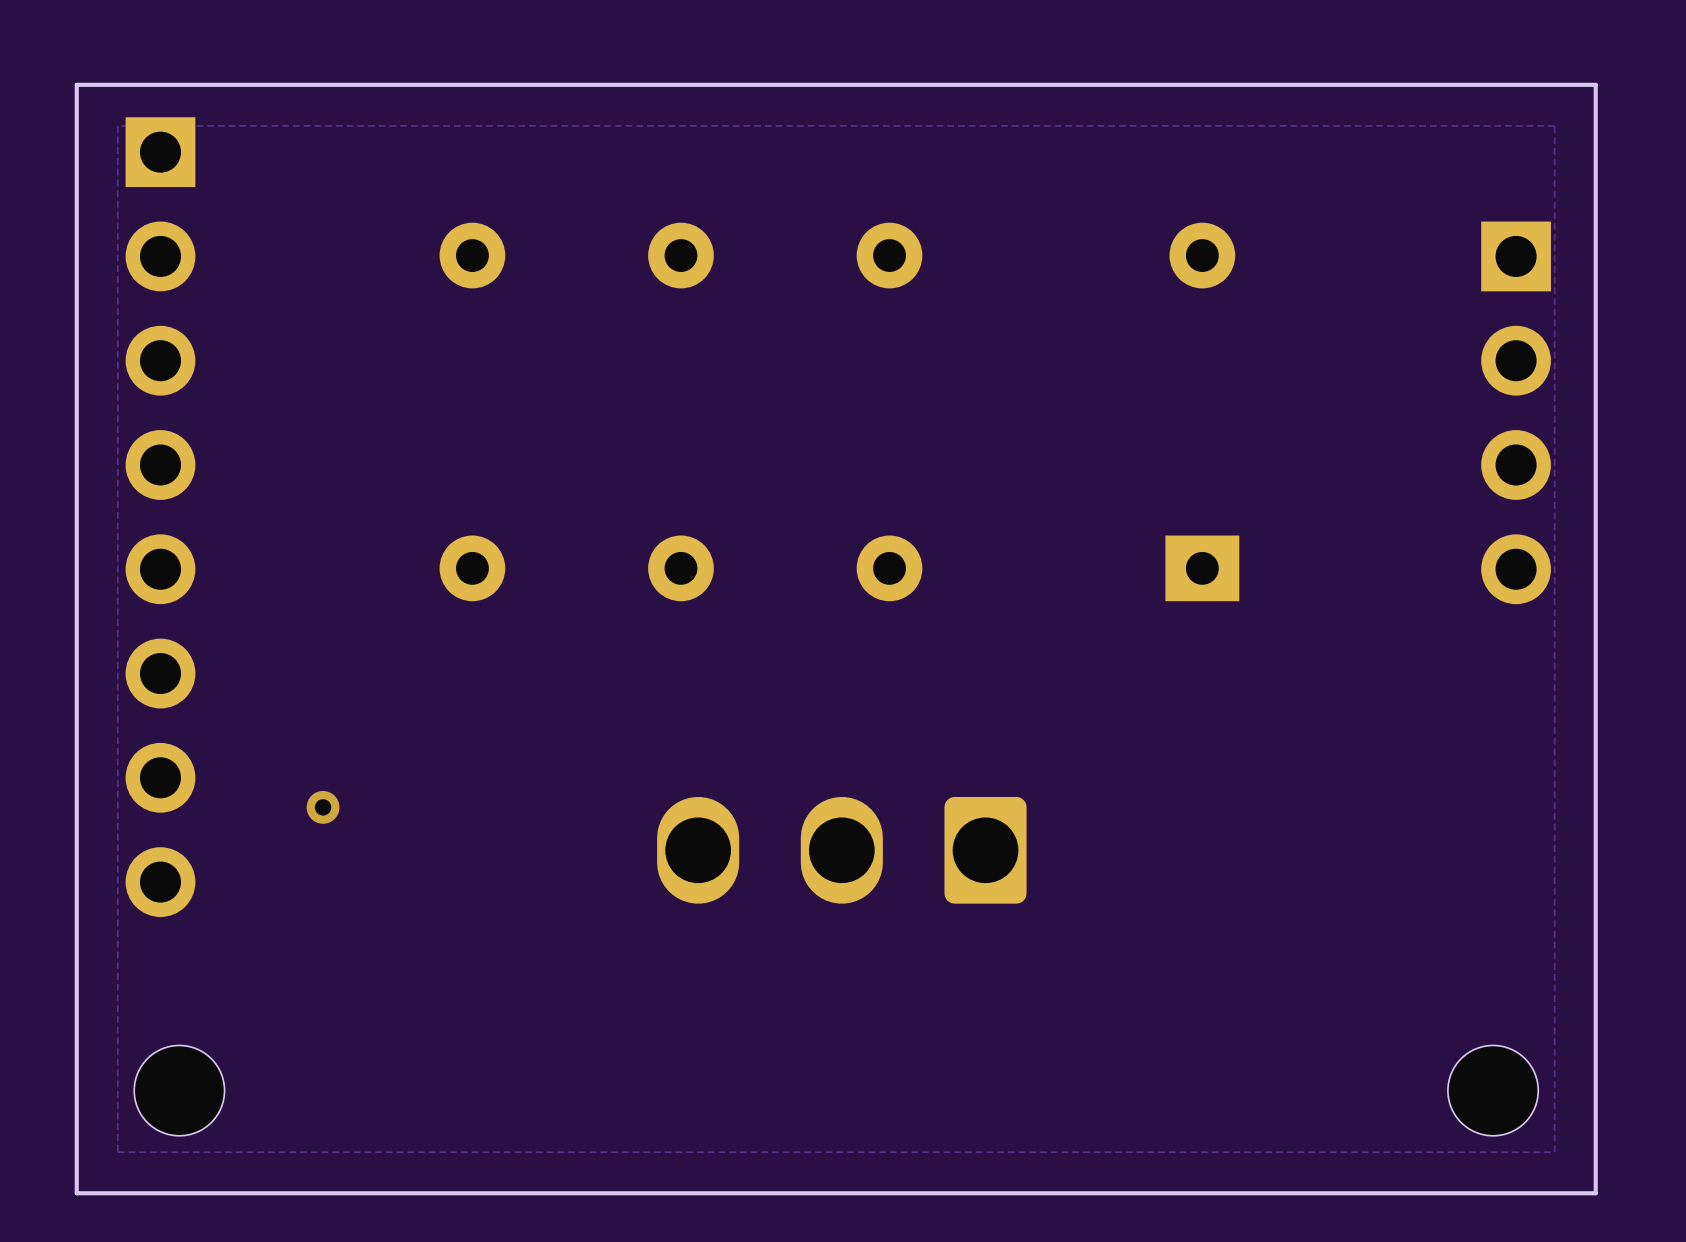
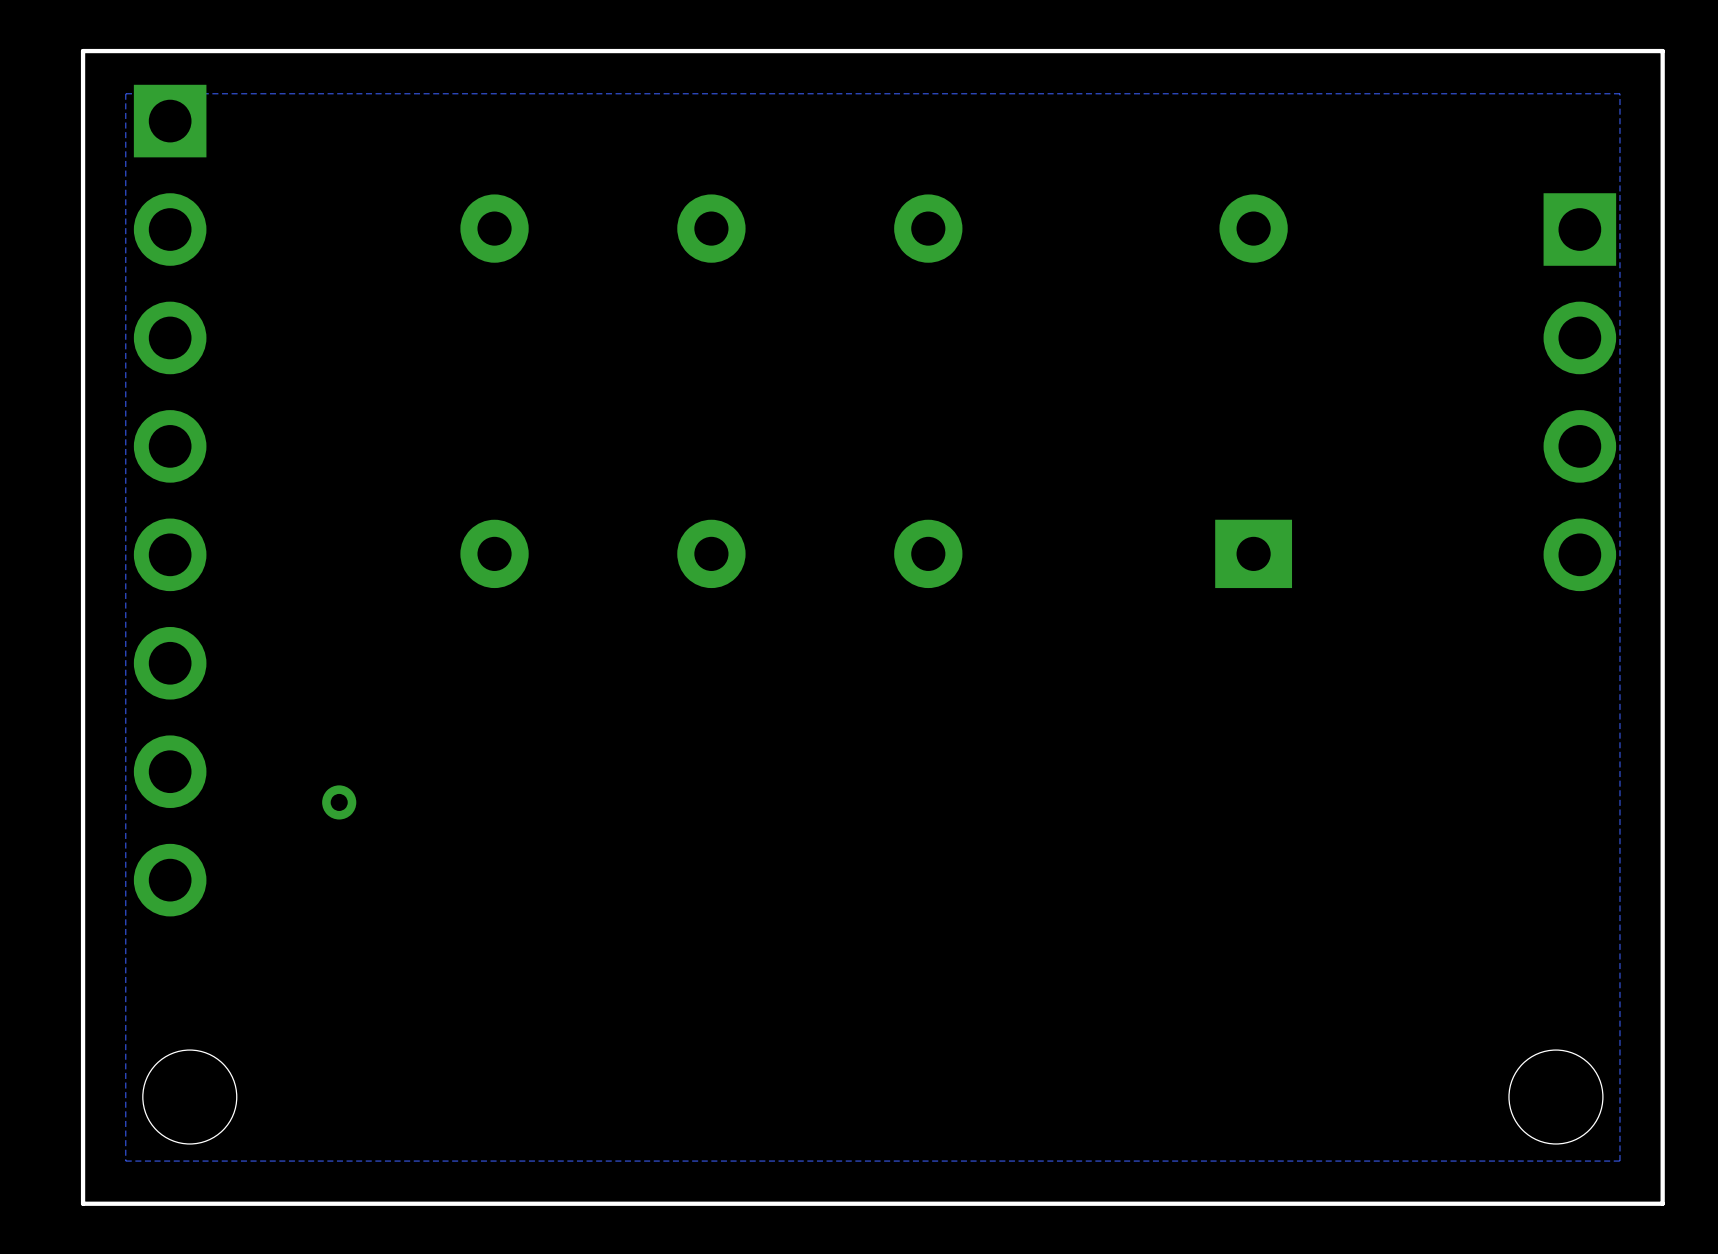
part: (841, 850) -> none

